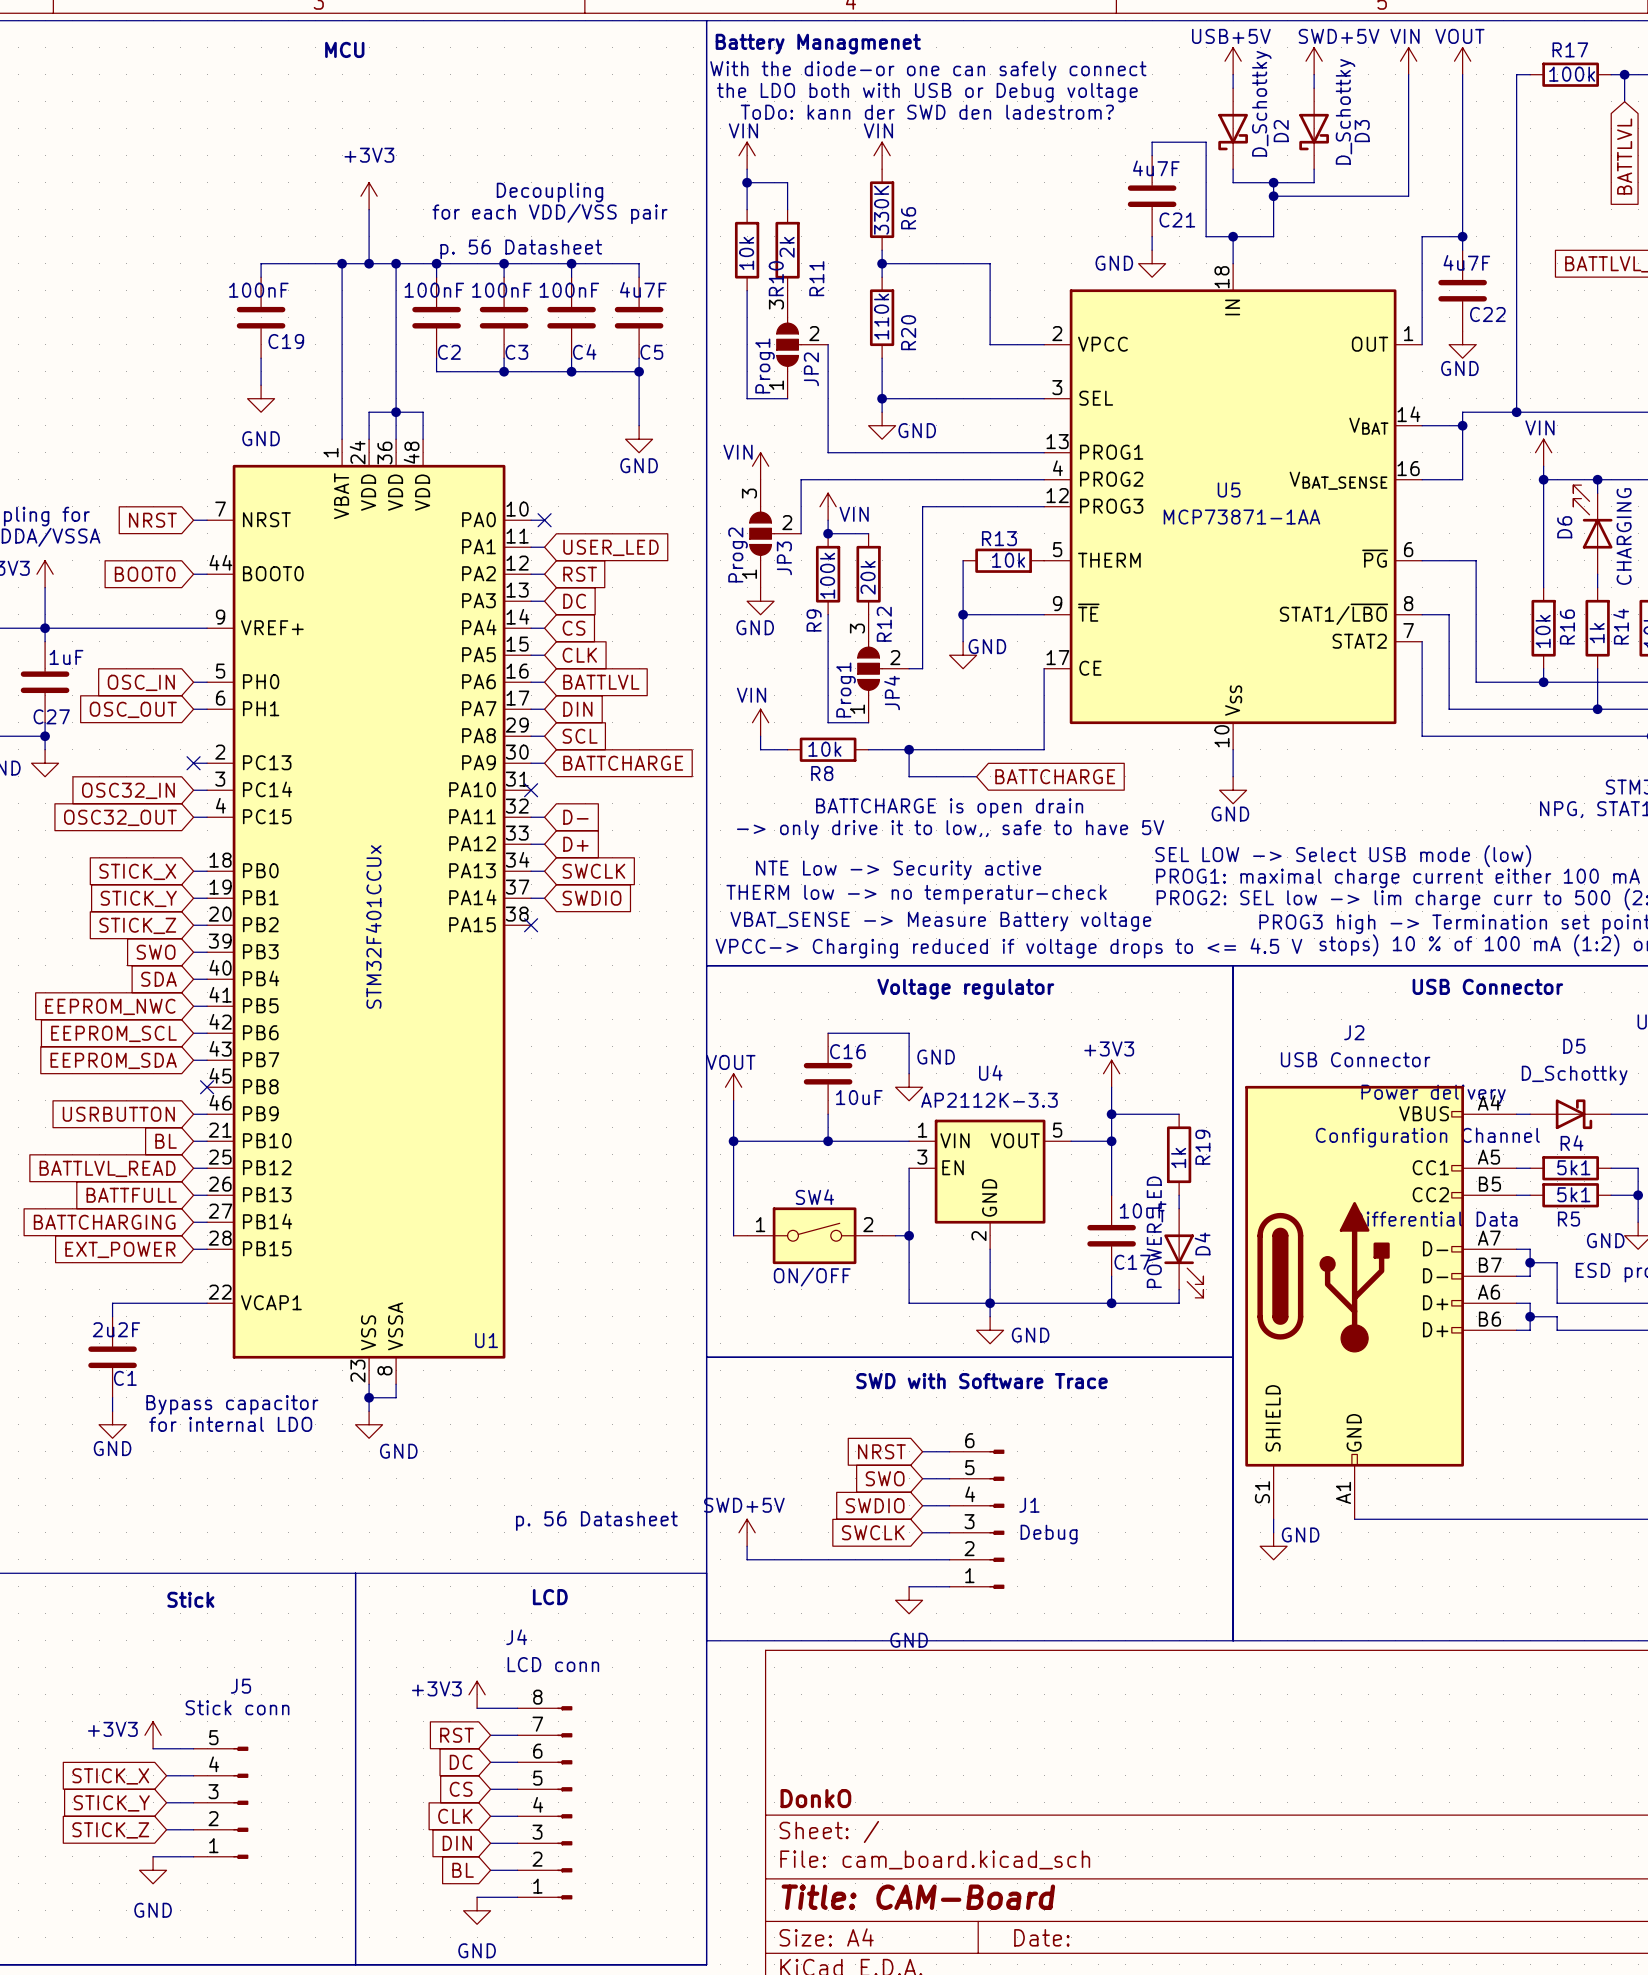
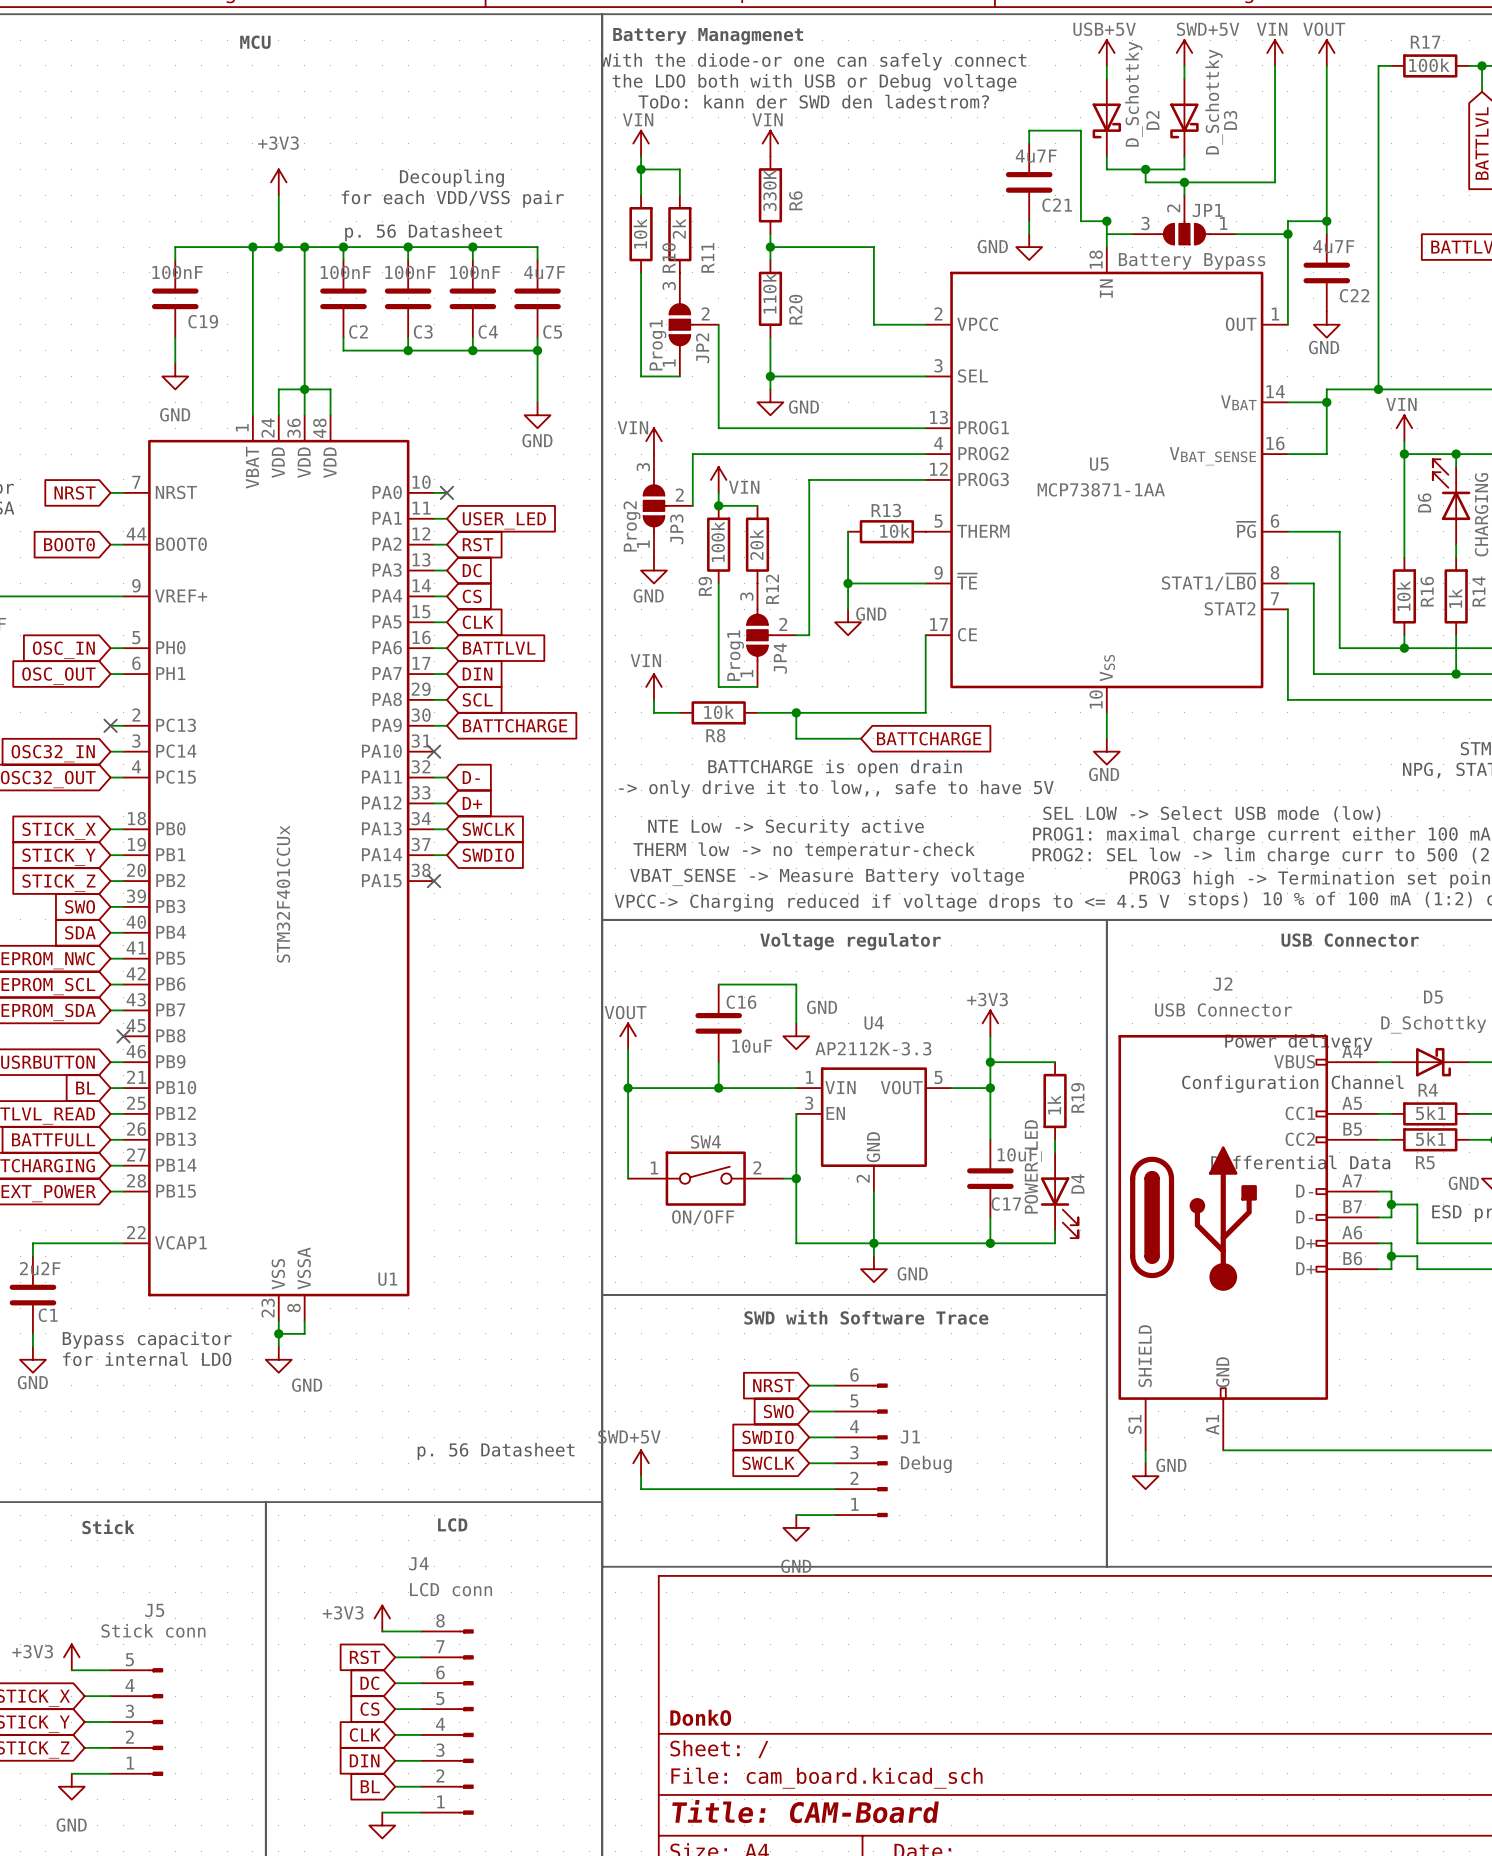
wire: (1273, 196) (1273, 236) (1233, 236) -> none
junction position: (1273, 196) -> (1184, 182)
wire: none -> (1184, 182) (1184, 195)
JP1: none -> Battery Bypass (1184, 219)
wire: none -> (1106, 234) (1132, 234)
wire: none -> (1236, 234) (1287, 234)
junction: none -> (1287, 234)

